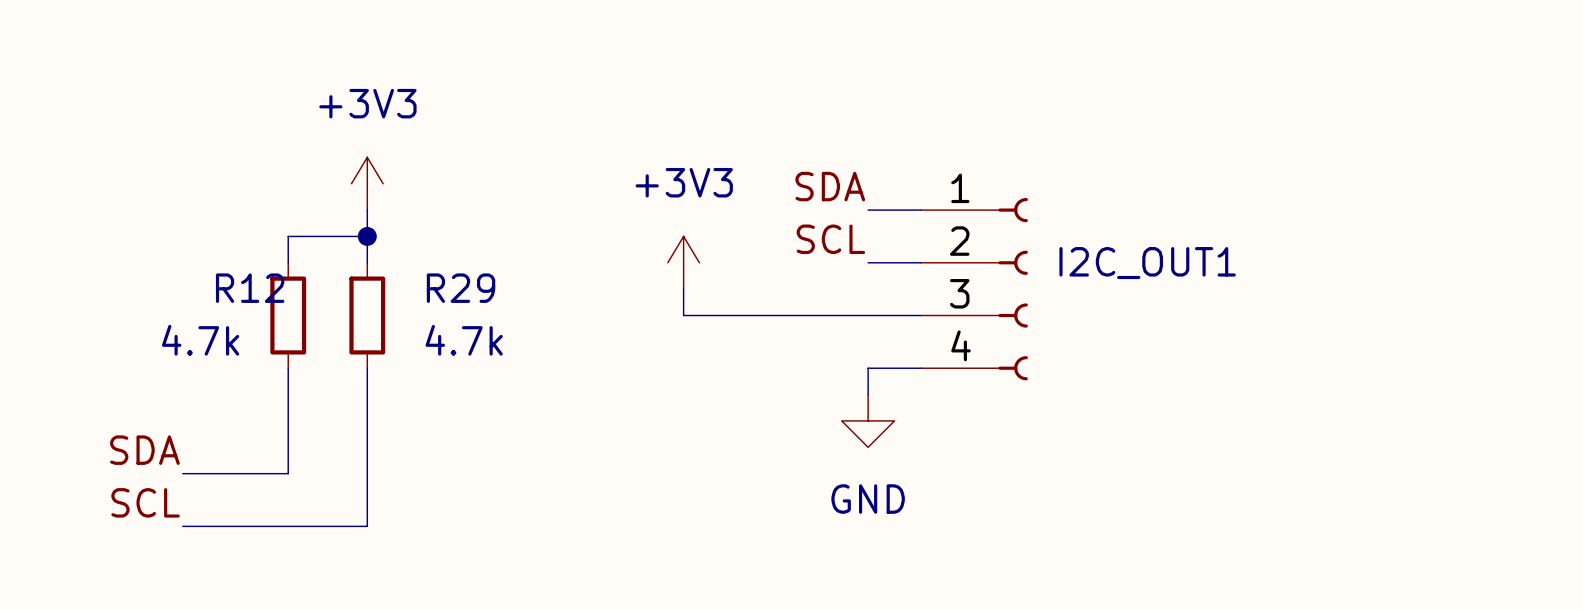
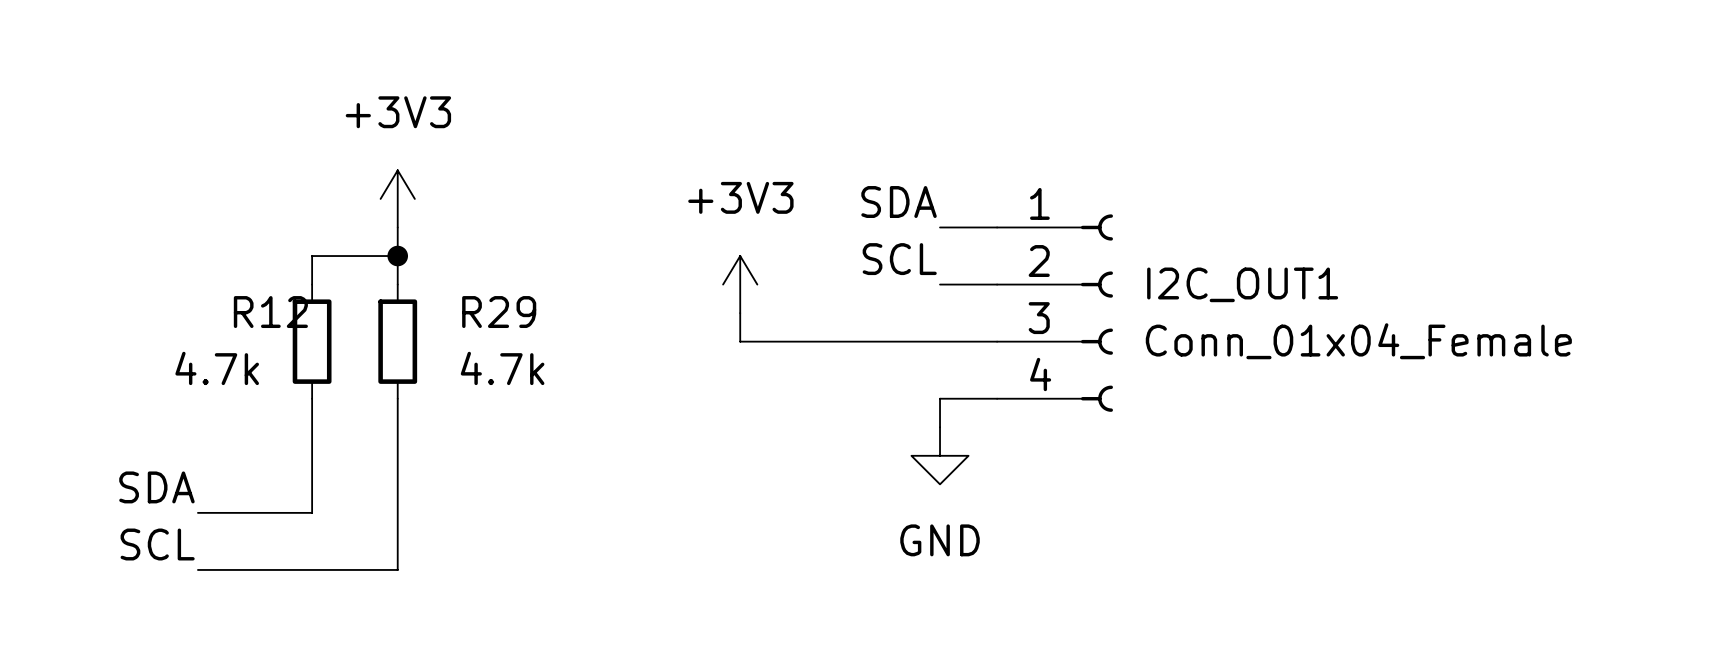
I2C_OUT1 value: none -> Conn_01x04_Female (1358, 341)

